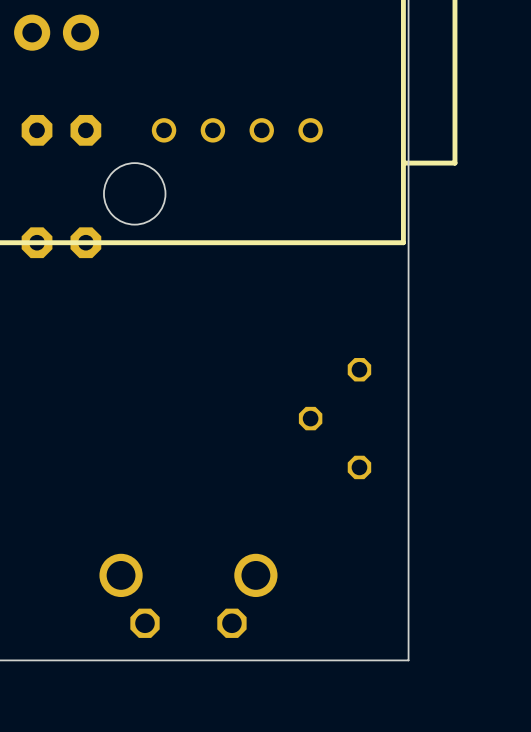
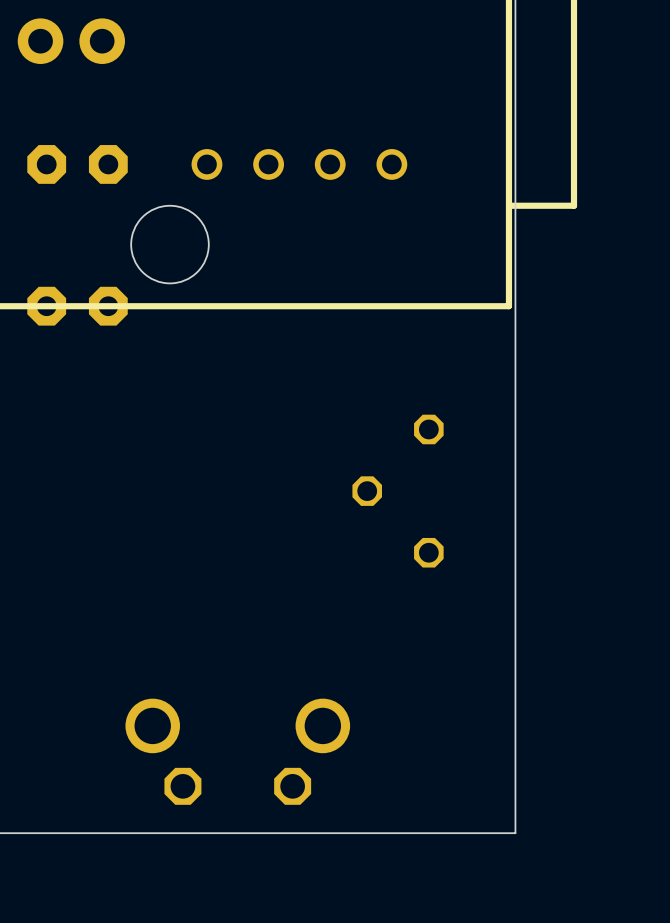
part position: (335, 418) -> (398, 491)

